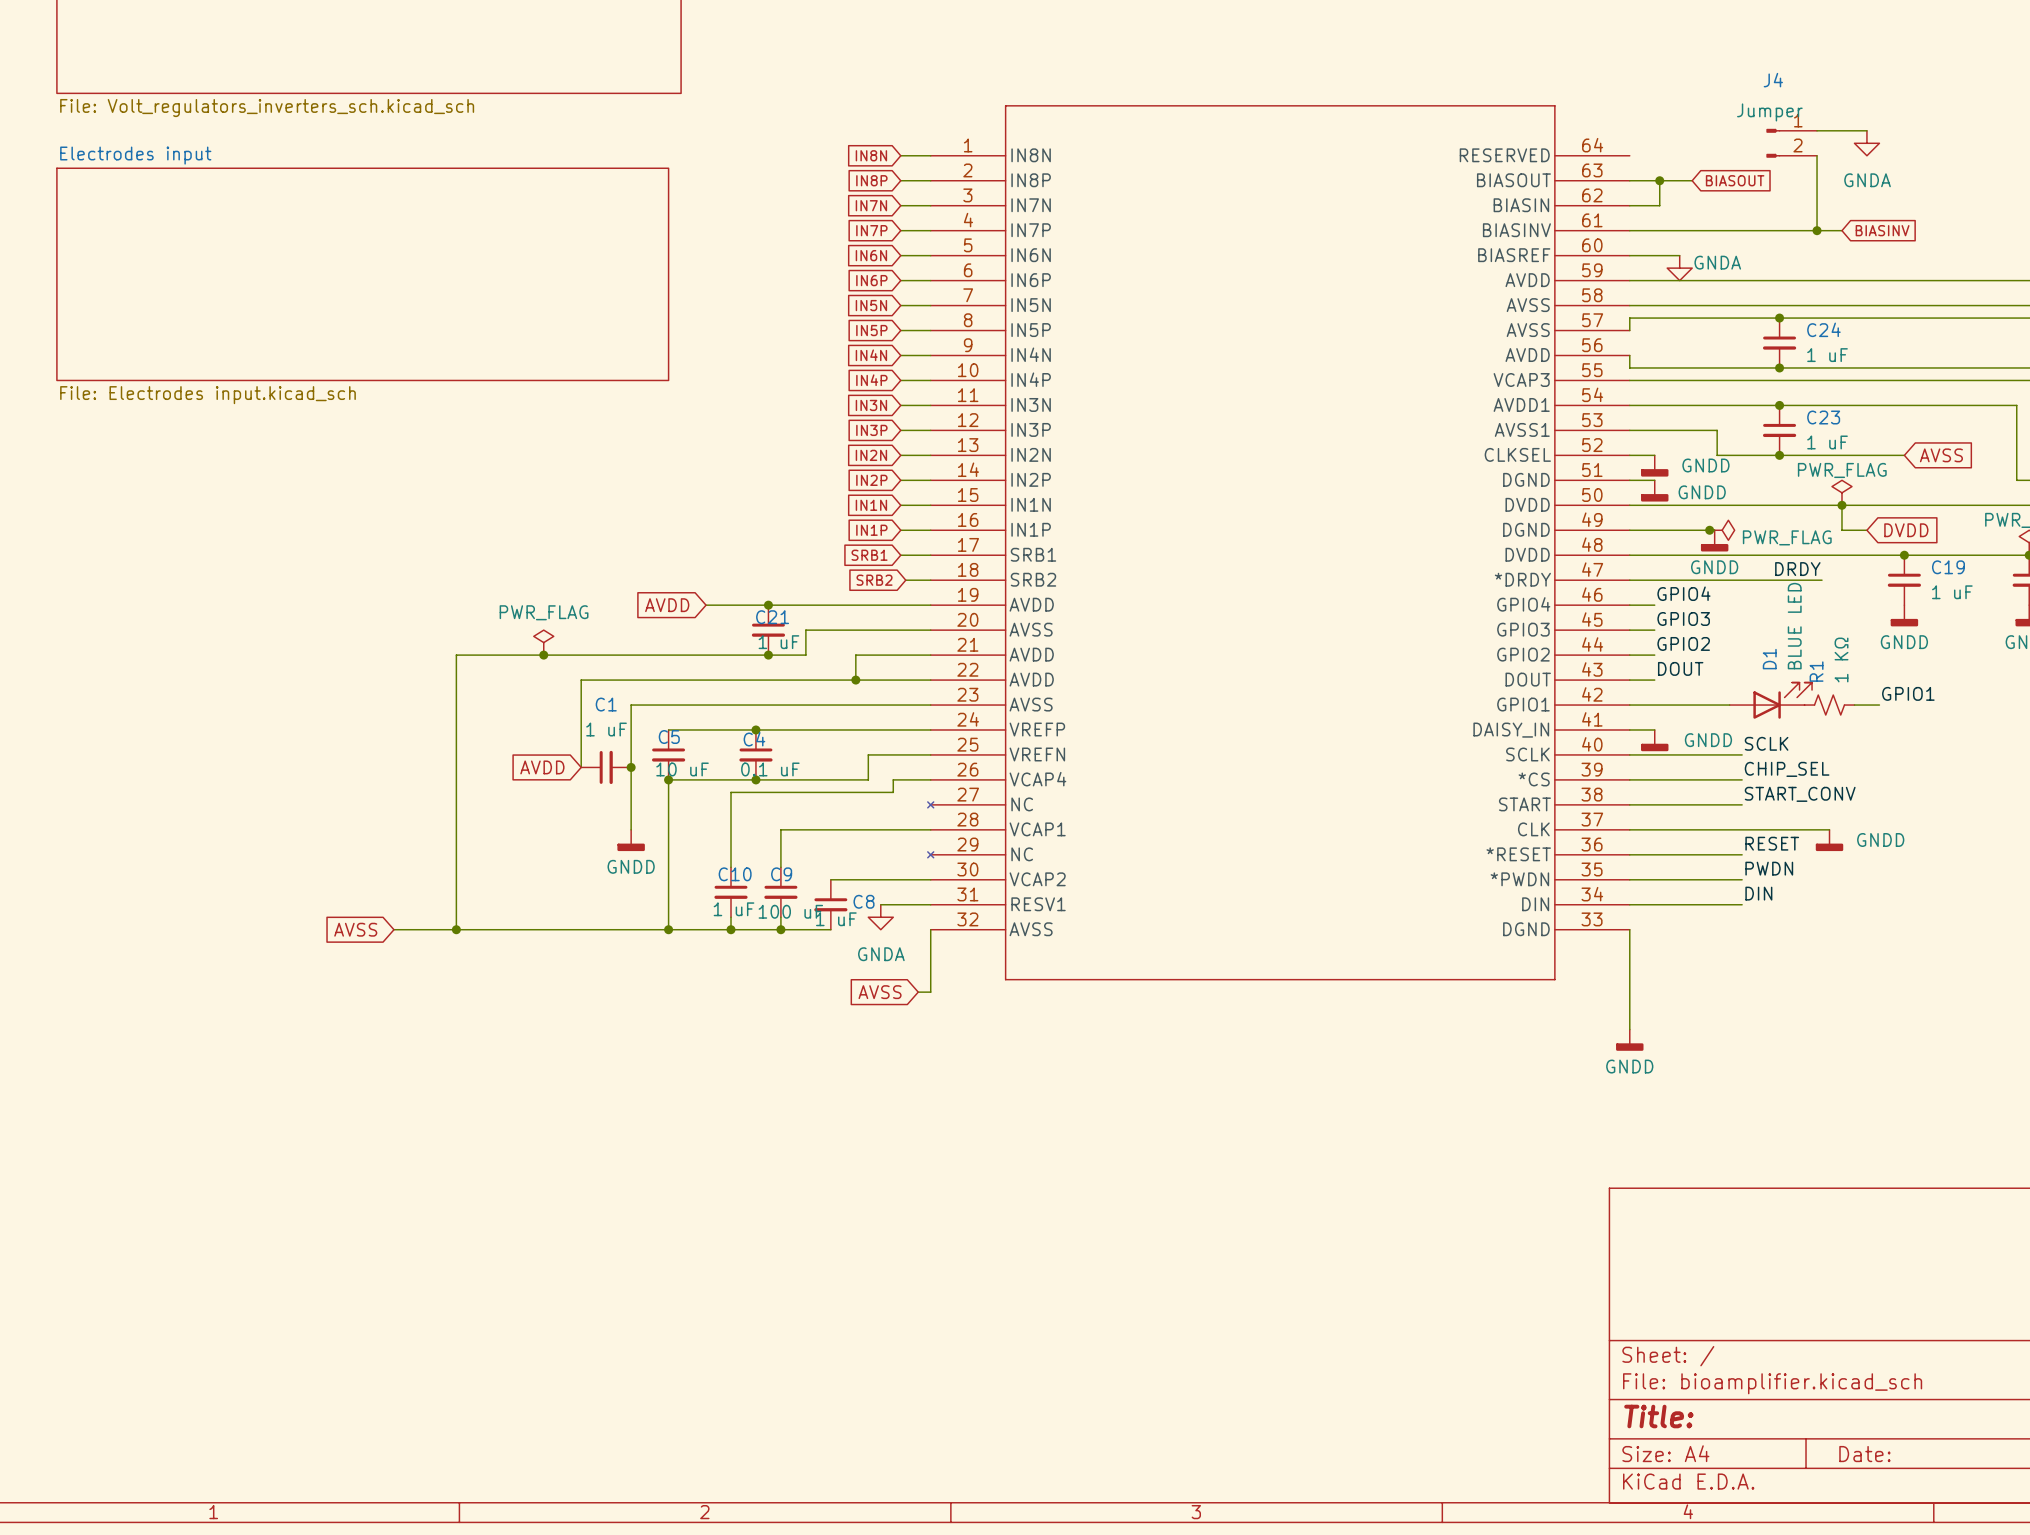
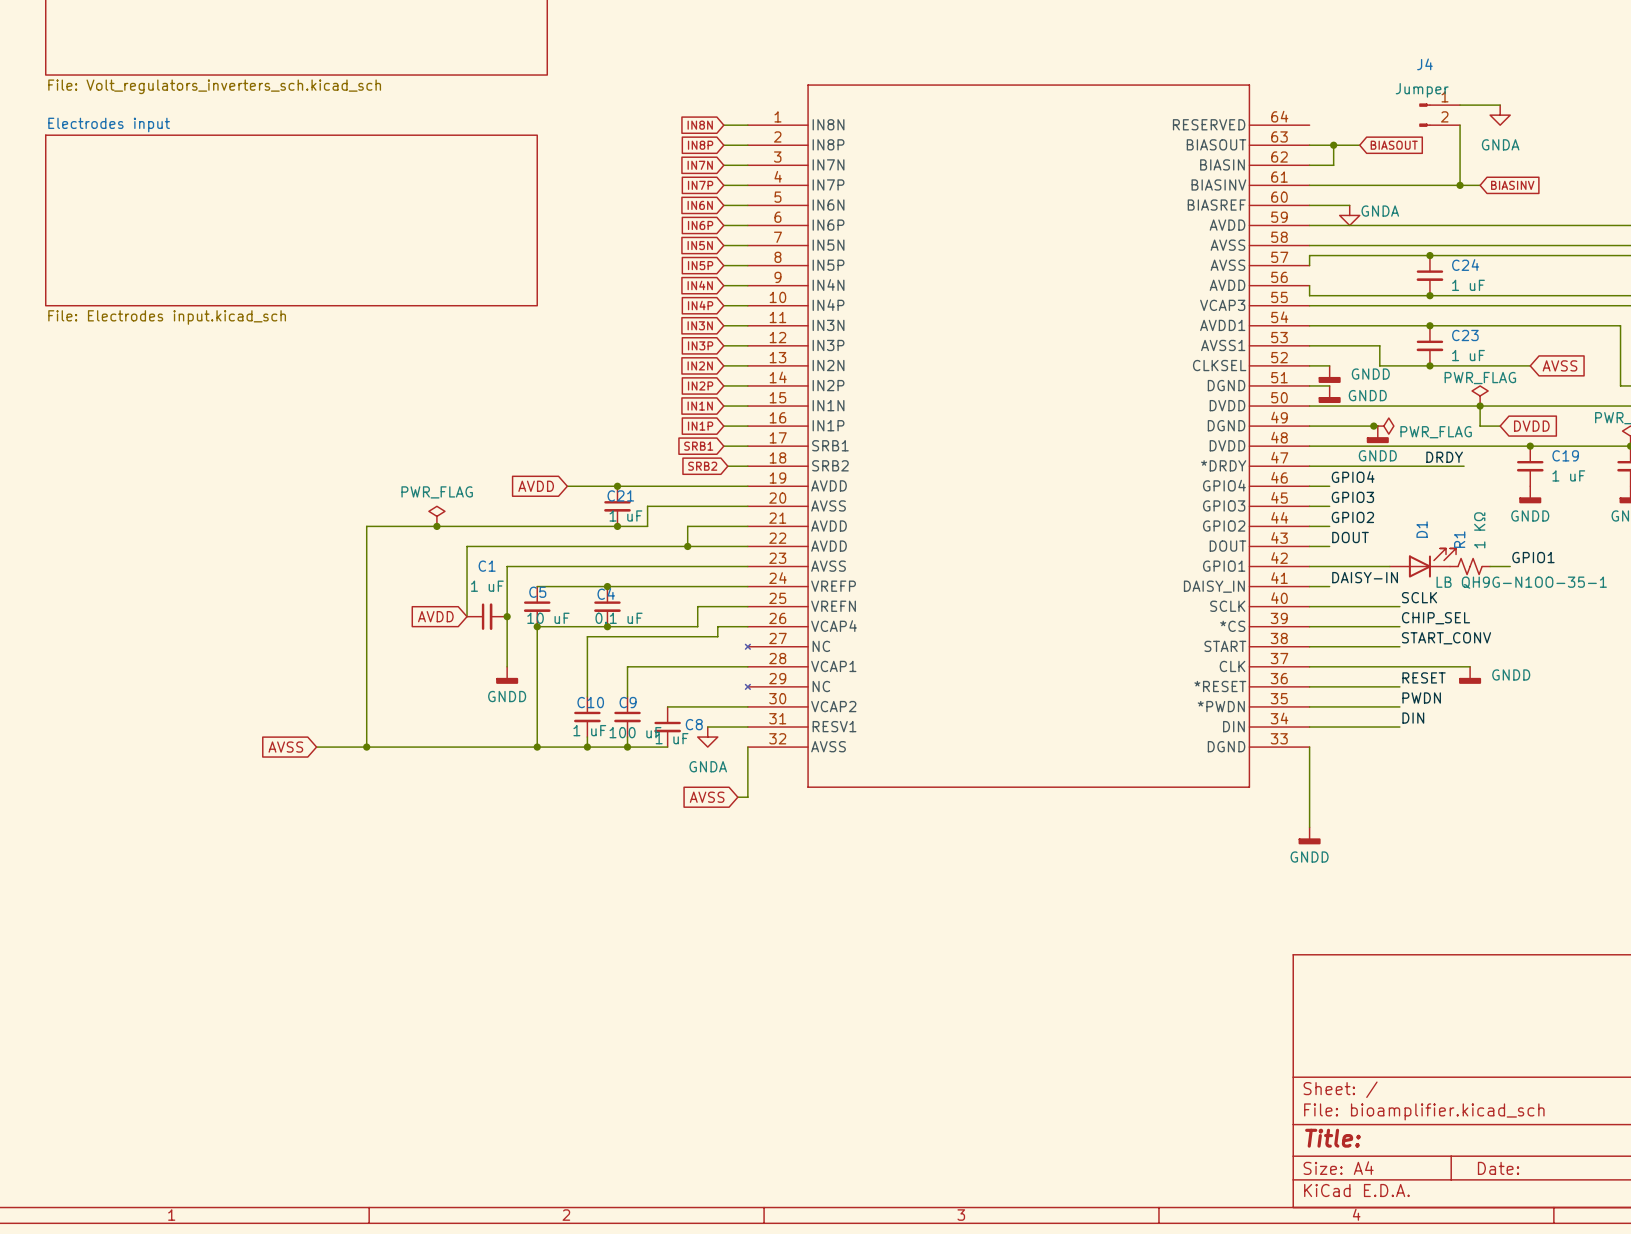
D1 value: BLUE LED (1794, 626) -> LB QH9G-N1OO-35-1 (1521, 582)
label: none -> DAISY-IN (1365, 577)
power symbol: GNDD (1654, 740) -> none

